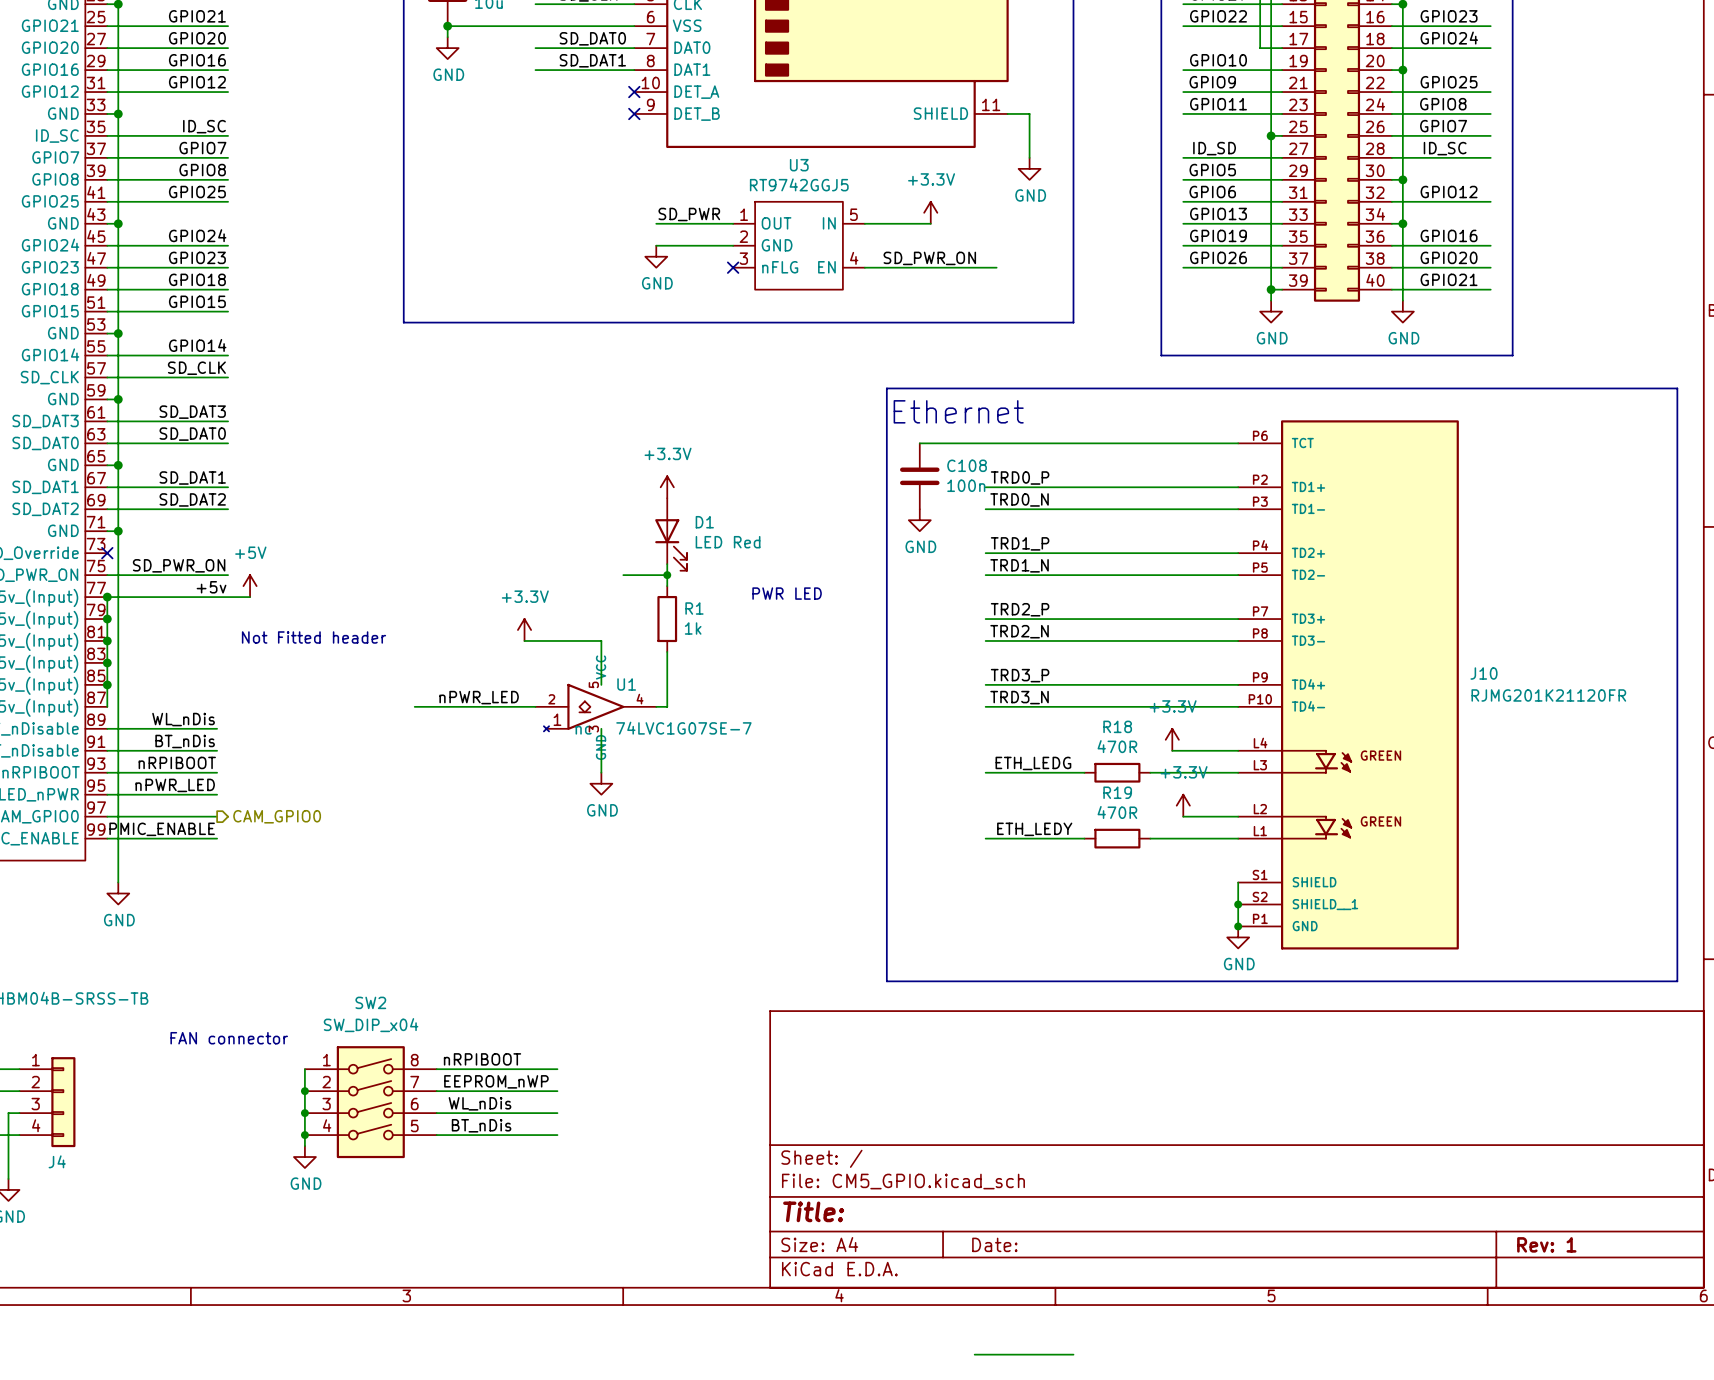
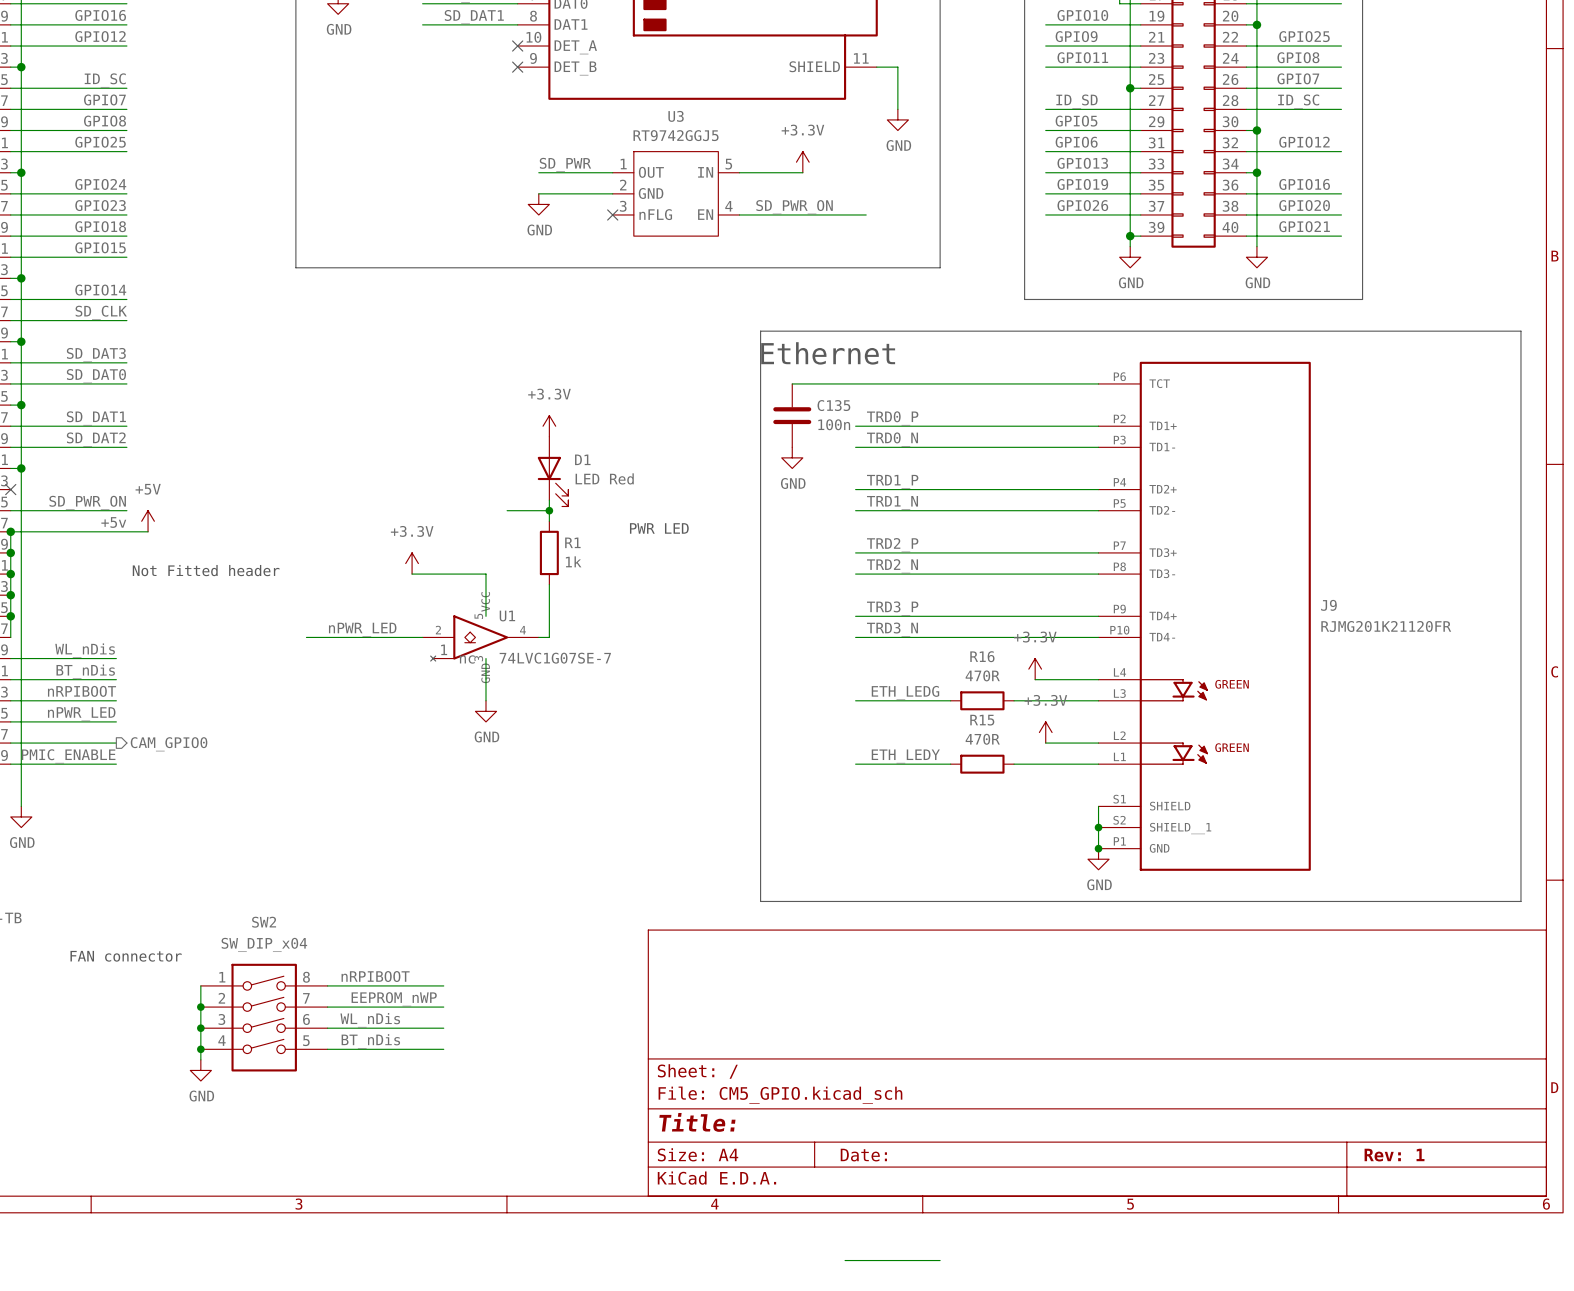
C108 name: C108 (967, 465) -> C135 (833, 405)
J10 name: J10 (1483, 673) -> J9 (1328, 605)
R18 name: R18 (1117, 726) -> R16 (982, 656)
R19 name: R19 (1117, 792) -> R15 (982, 720)

